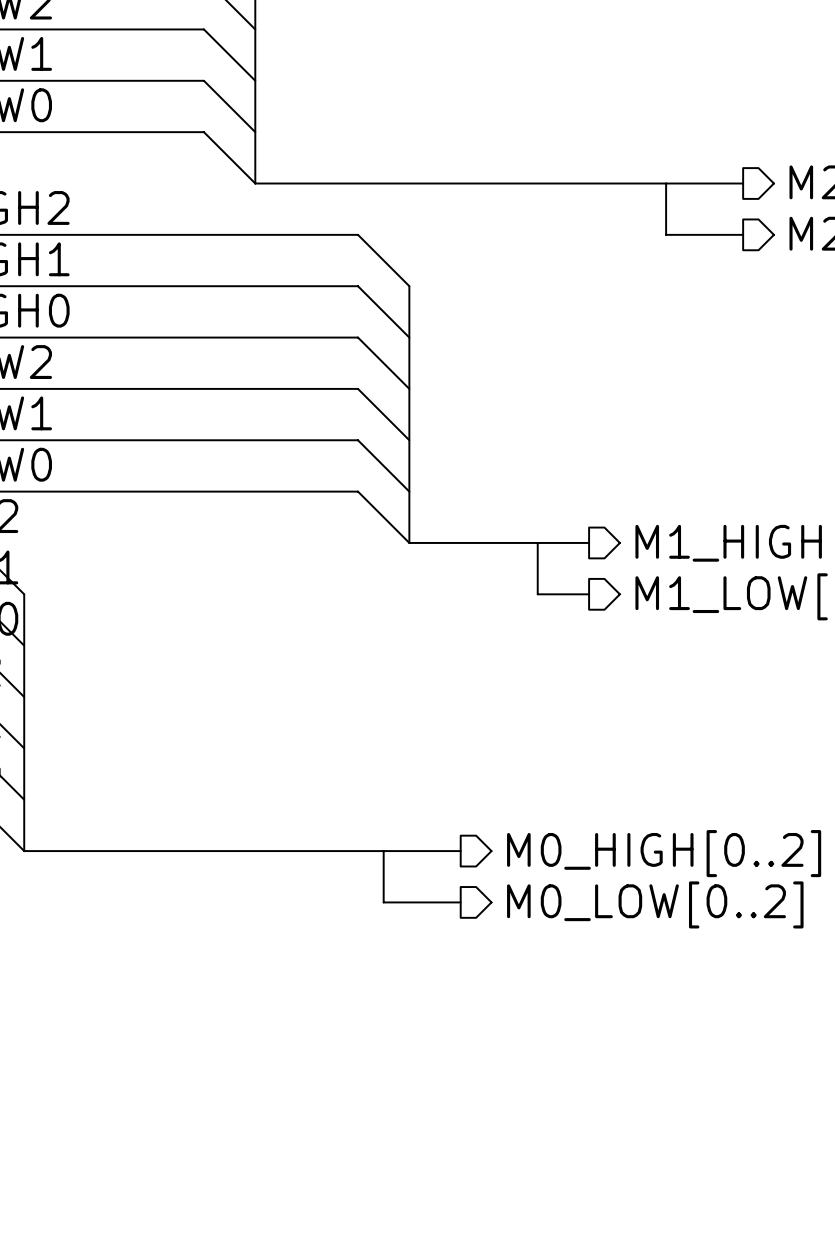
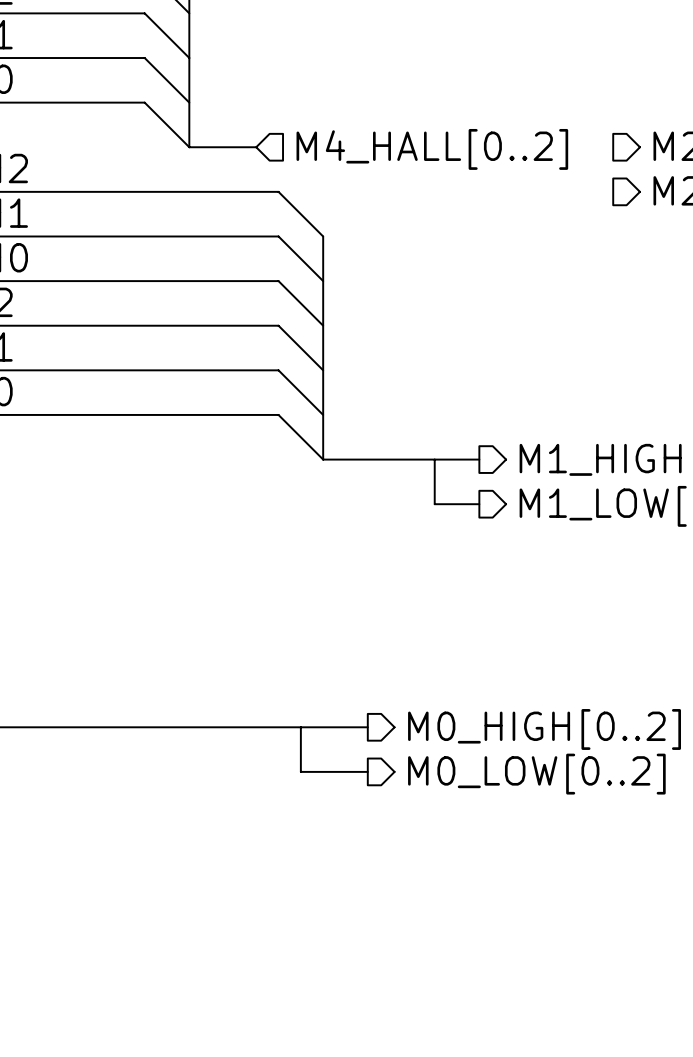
bus: (332, 183) (743, 183) -> none
bus: (666, 183) (666, 234) (743, 234) -> none
hierarchical label: none -> M4_HALL[0..2] (432, 149)

